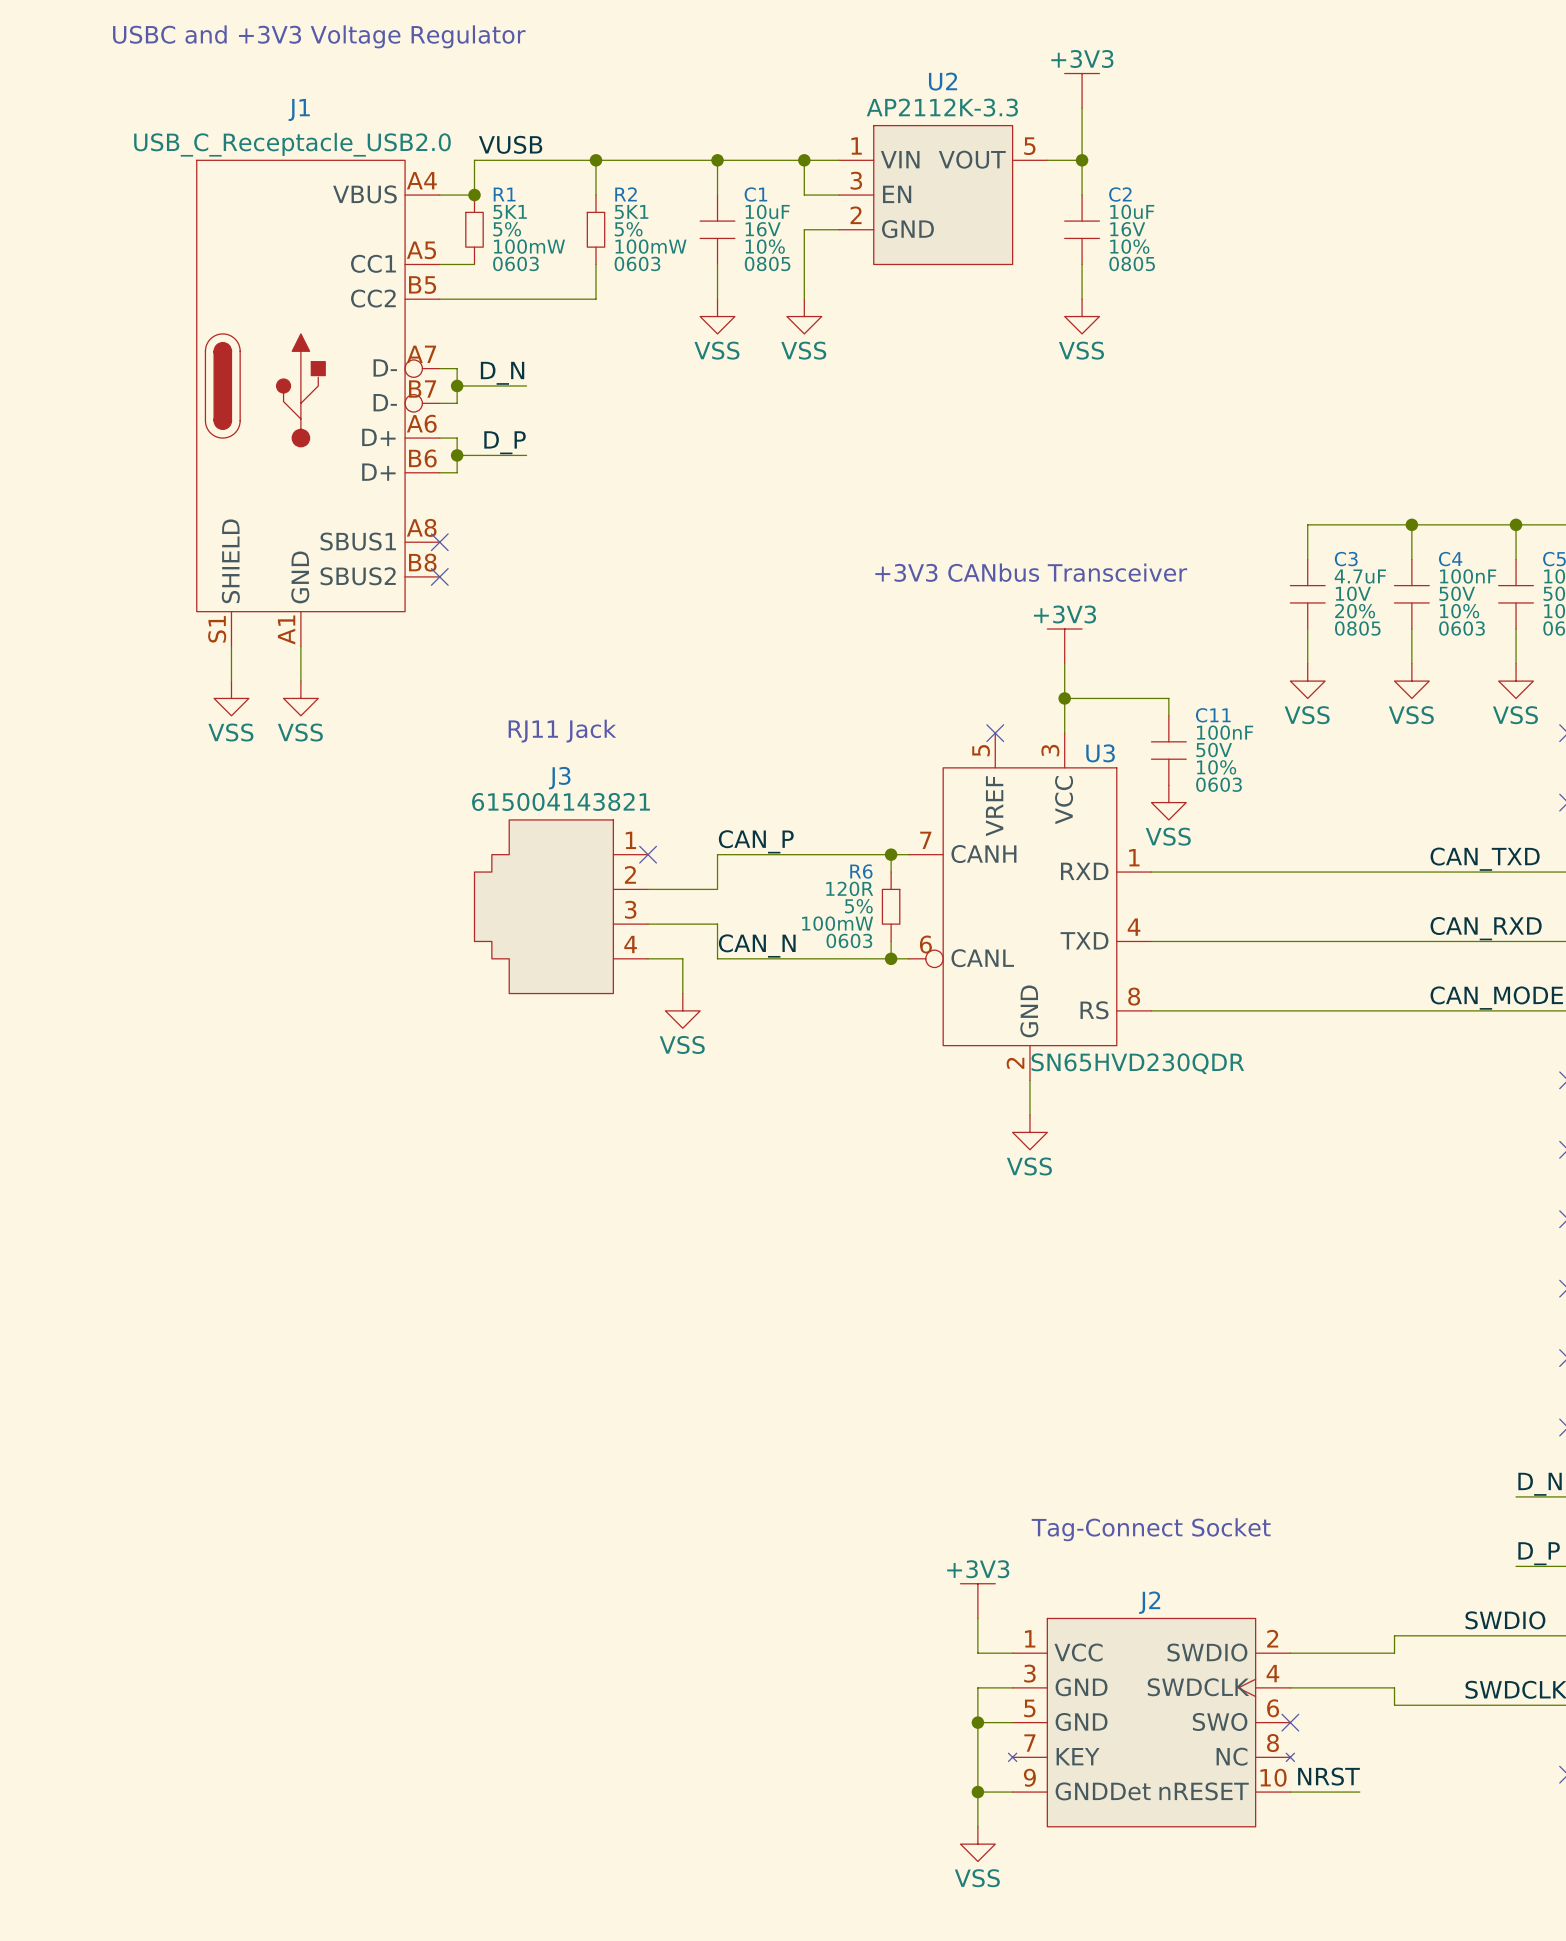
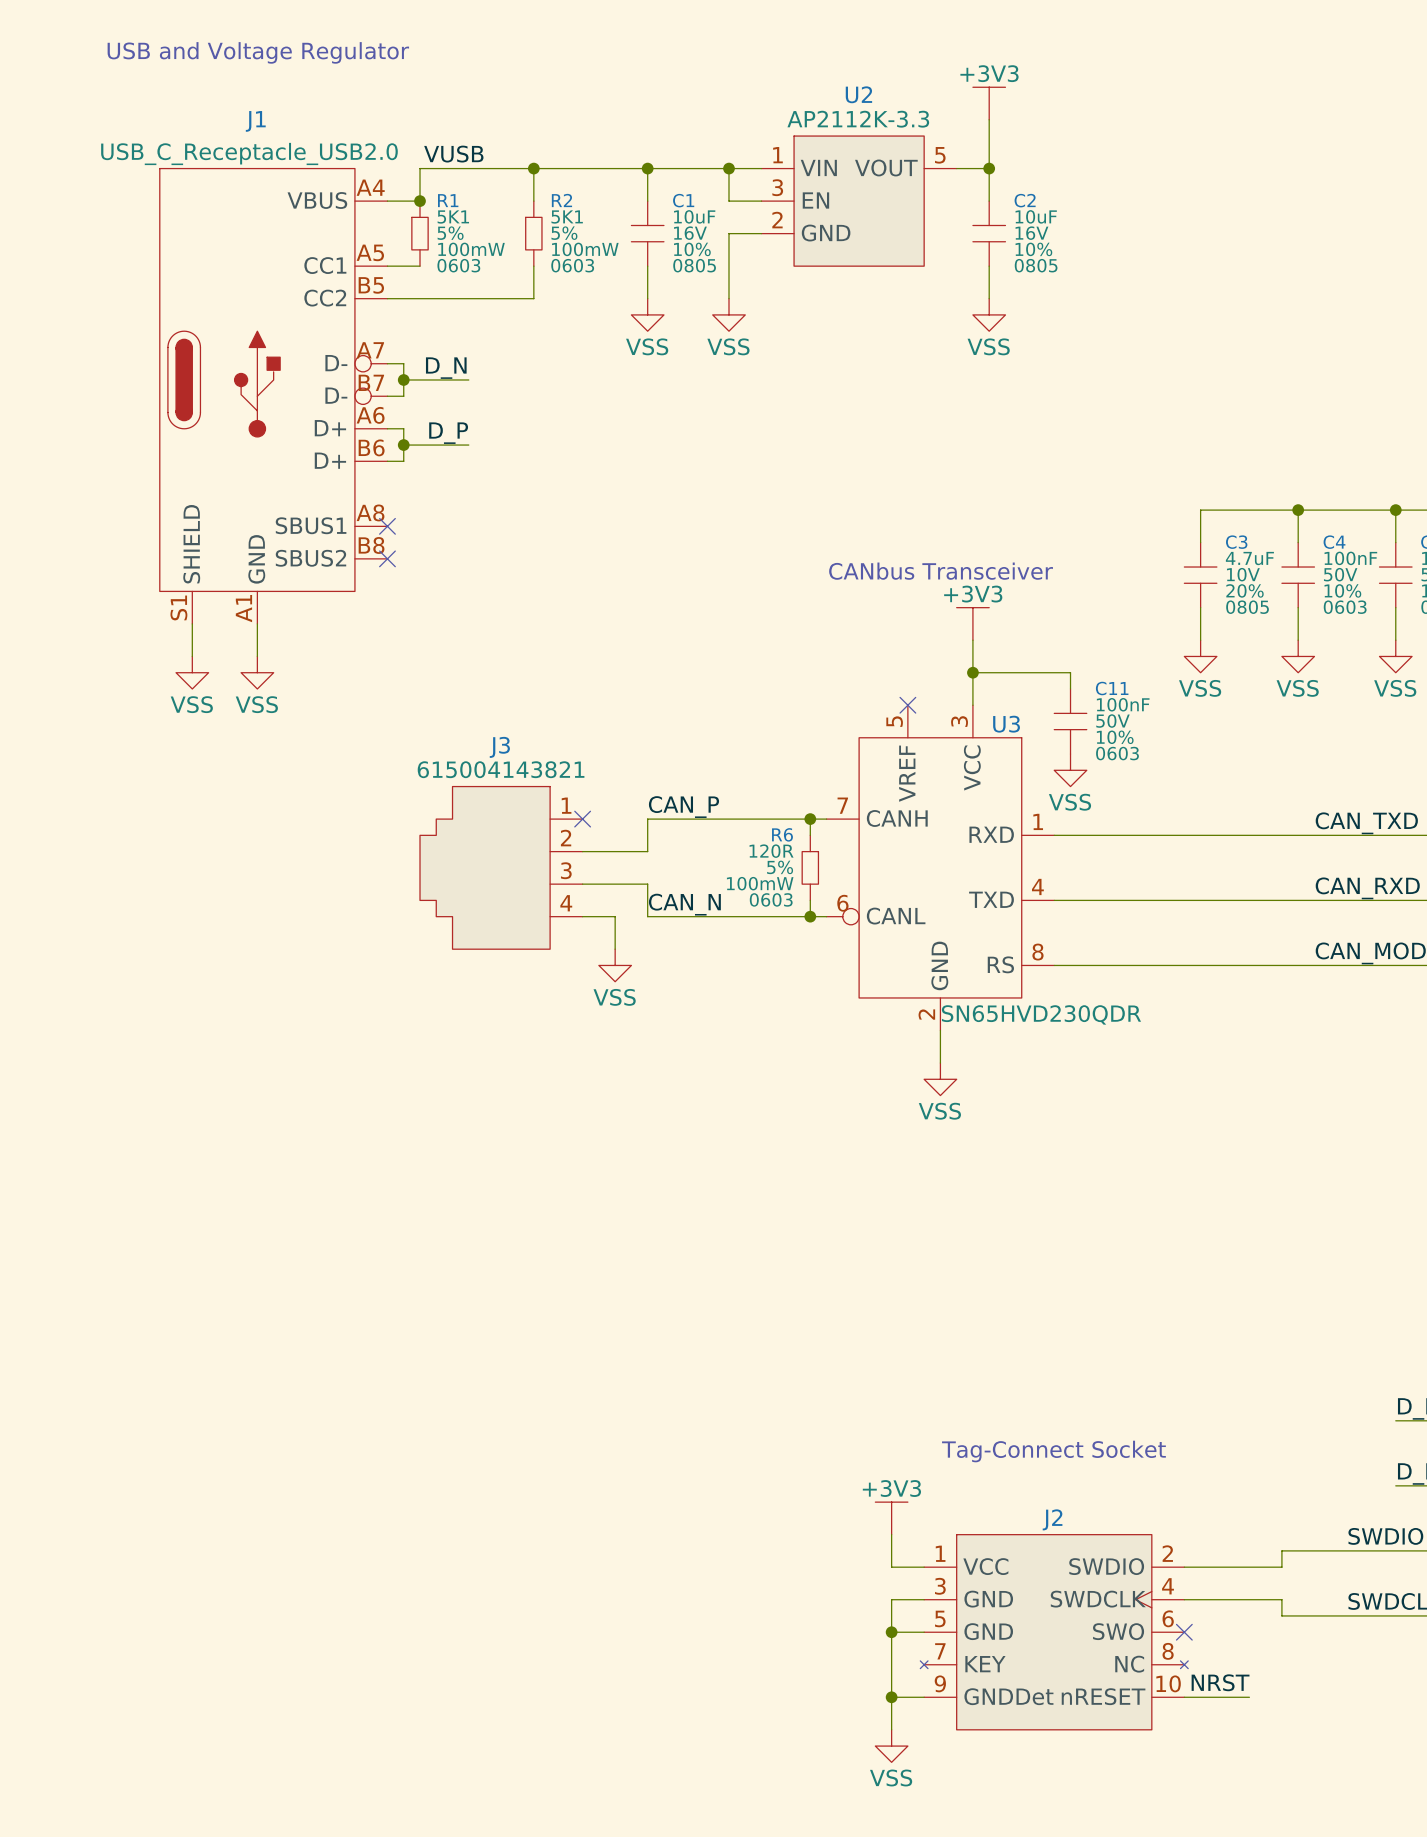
text: USBC and +3V3 Voltage Regulator (319, 36) -> USB and Voltage Regulator (258, 52)
text: +3V3 CANbus Transceiver (1031, 572) -> CANbus Transceiver (941, 571)
text: RJ11 Jack (562, 731) -> none

